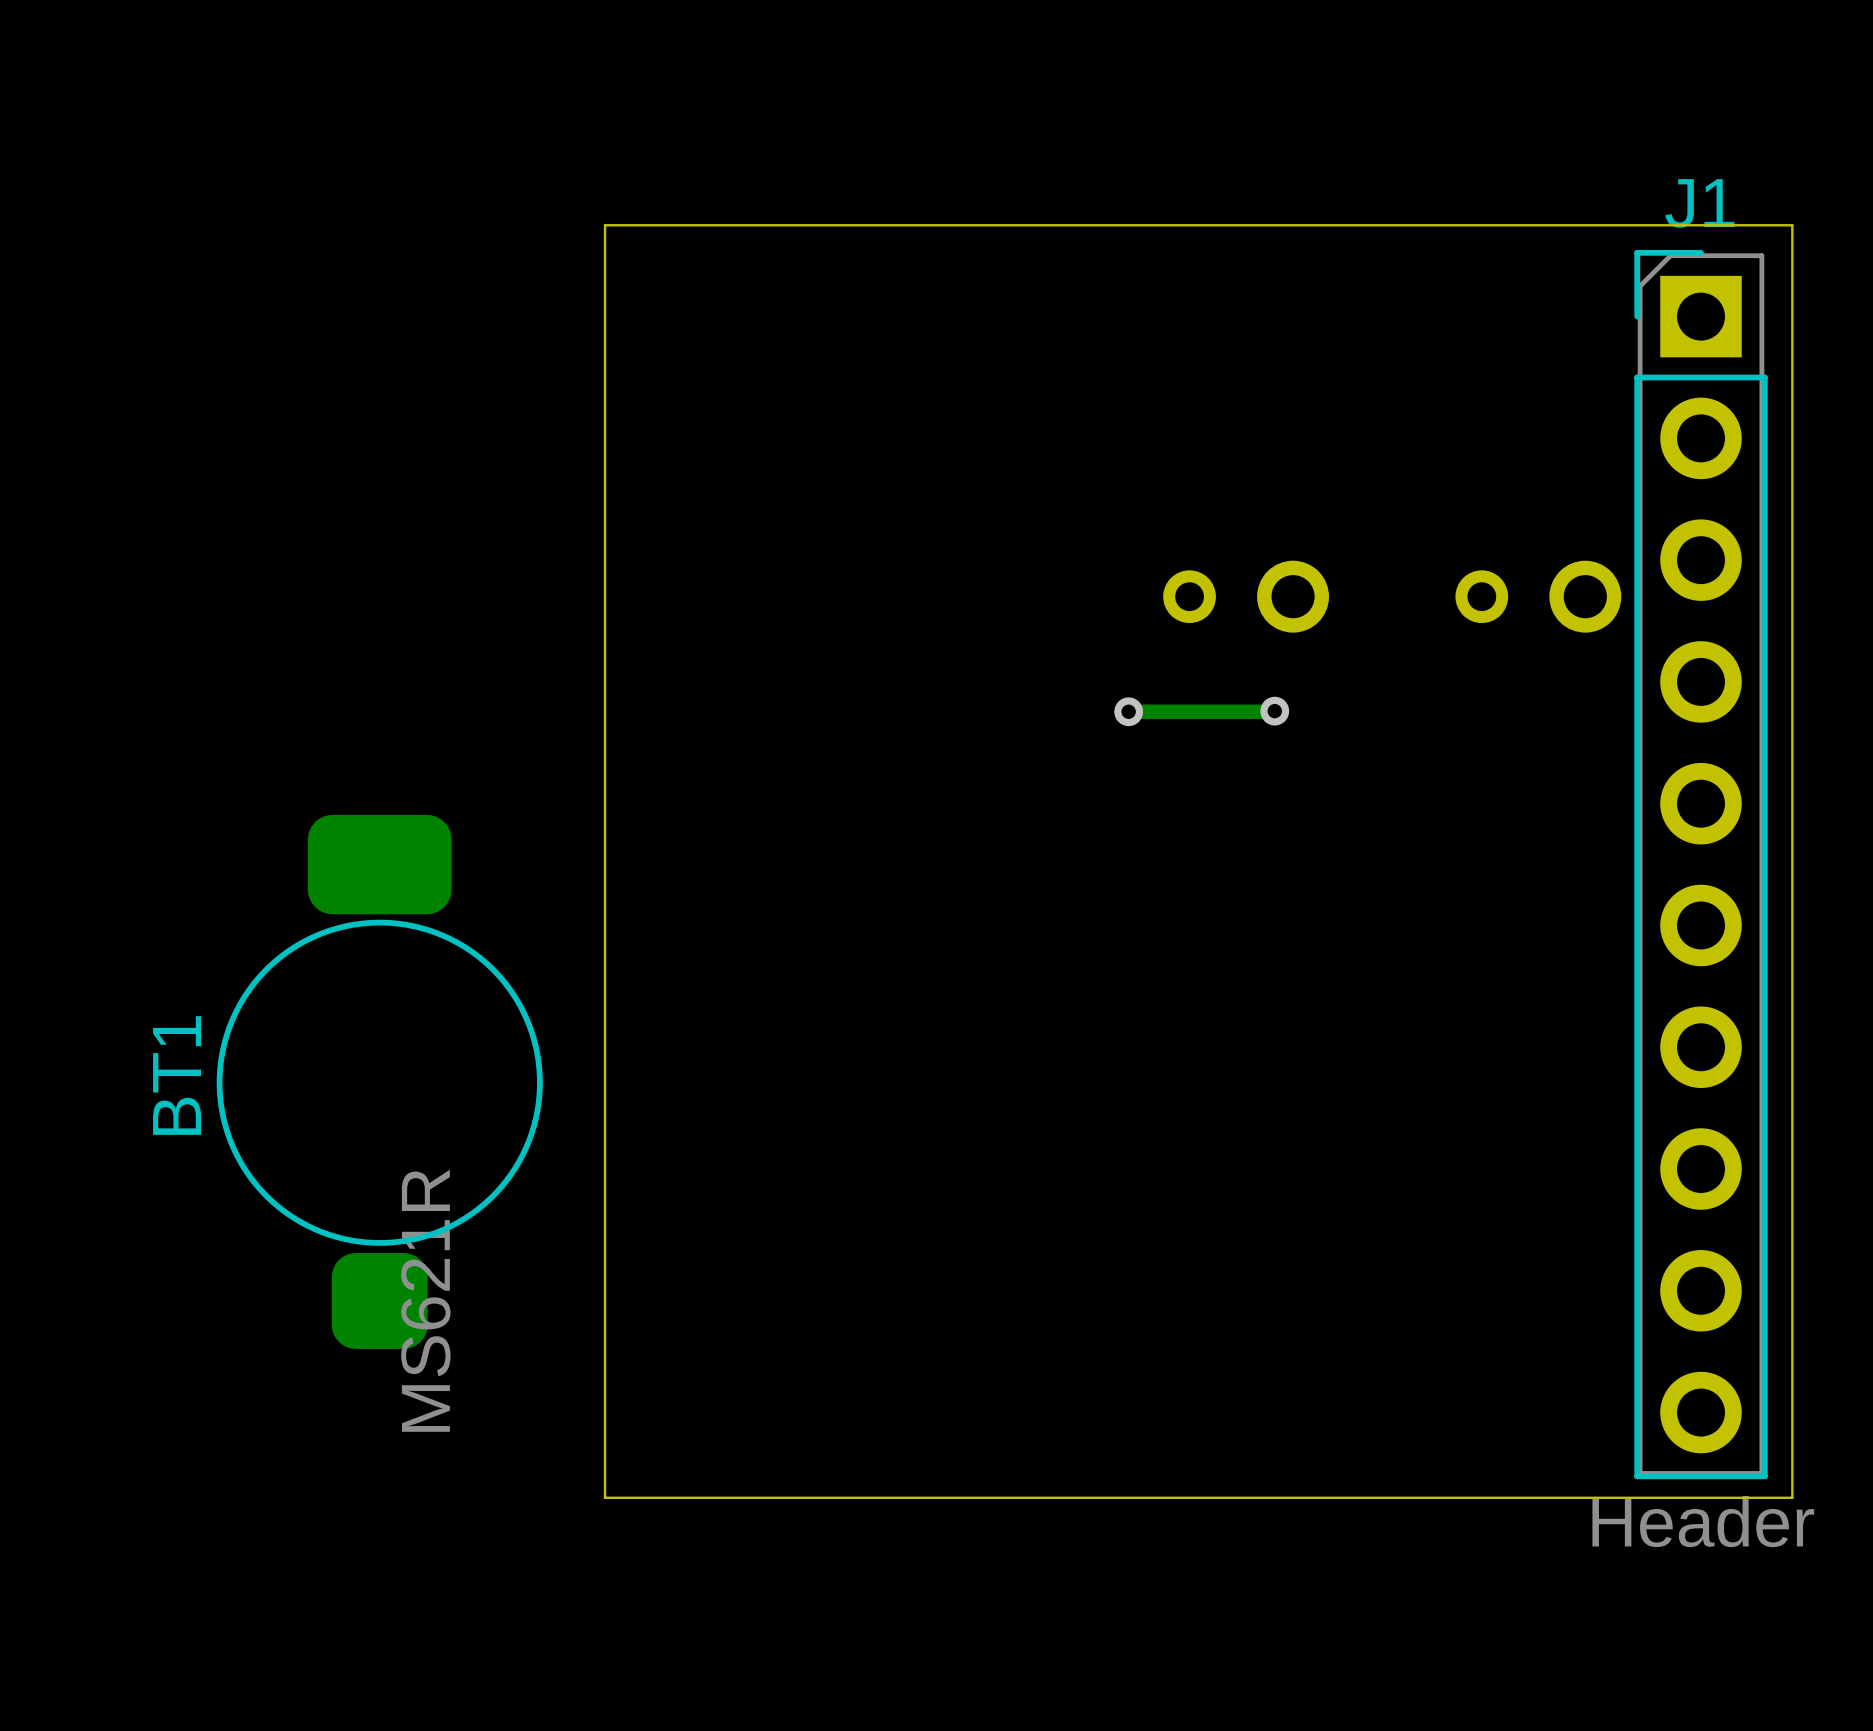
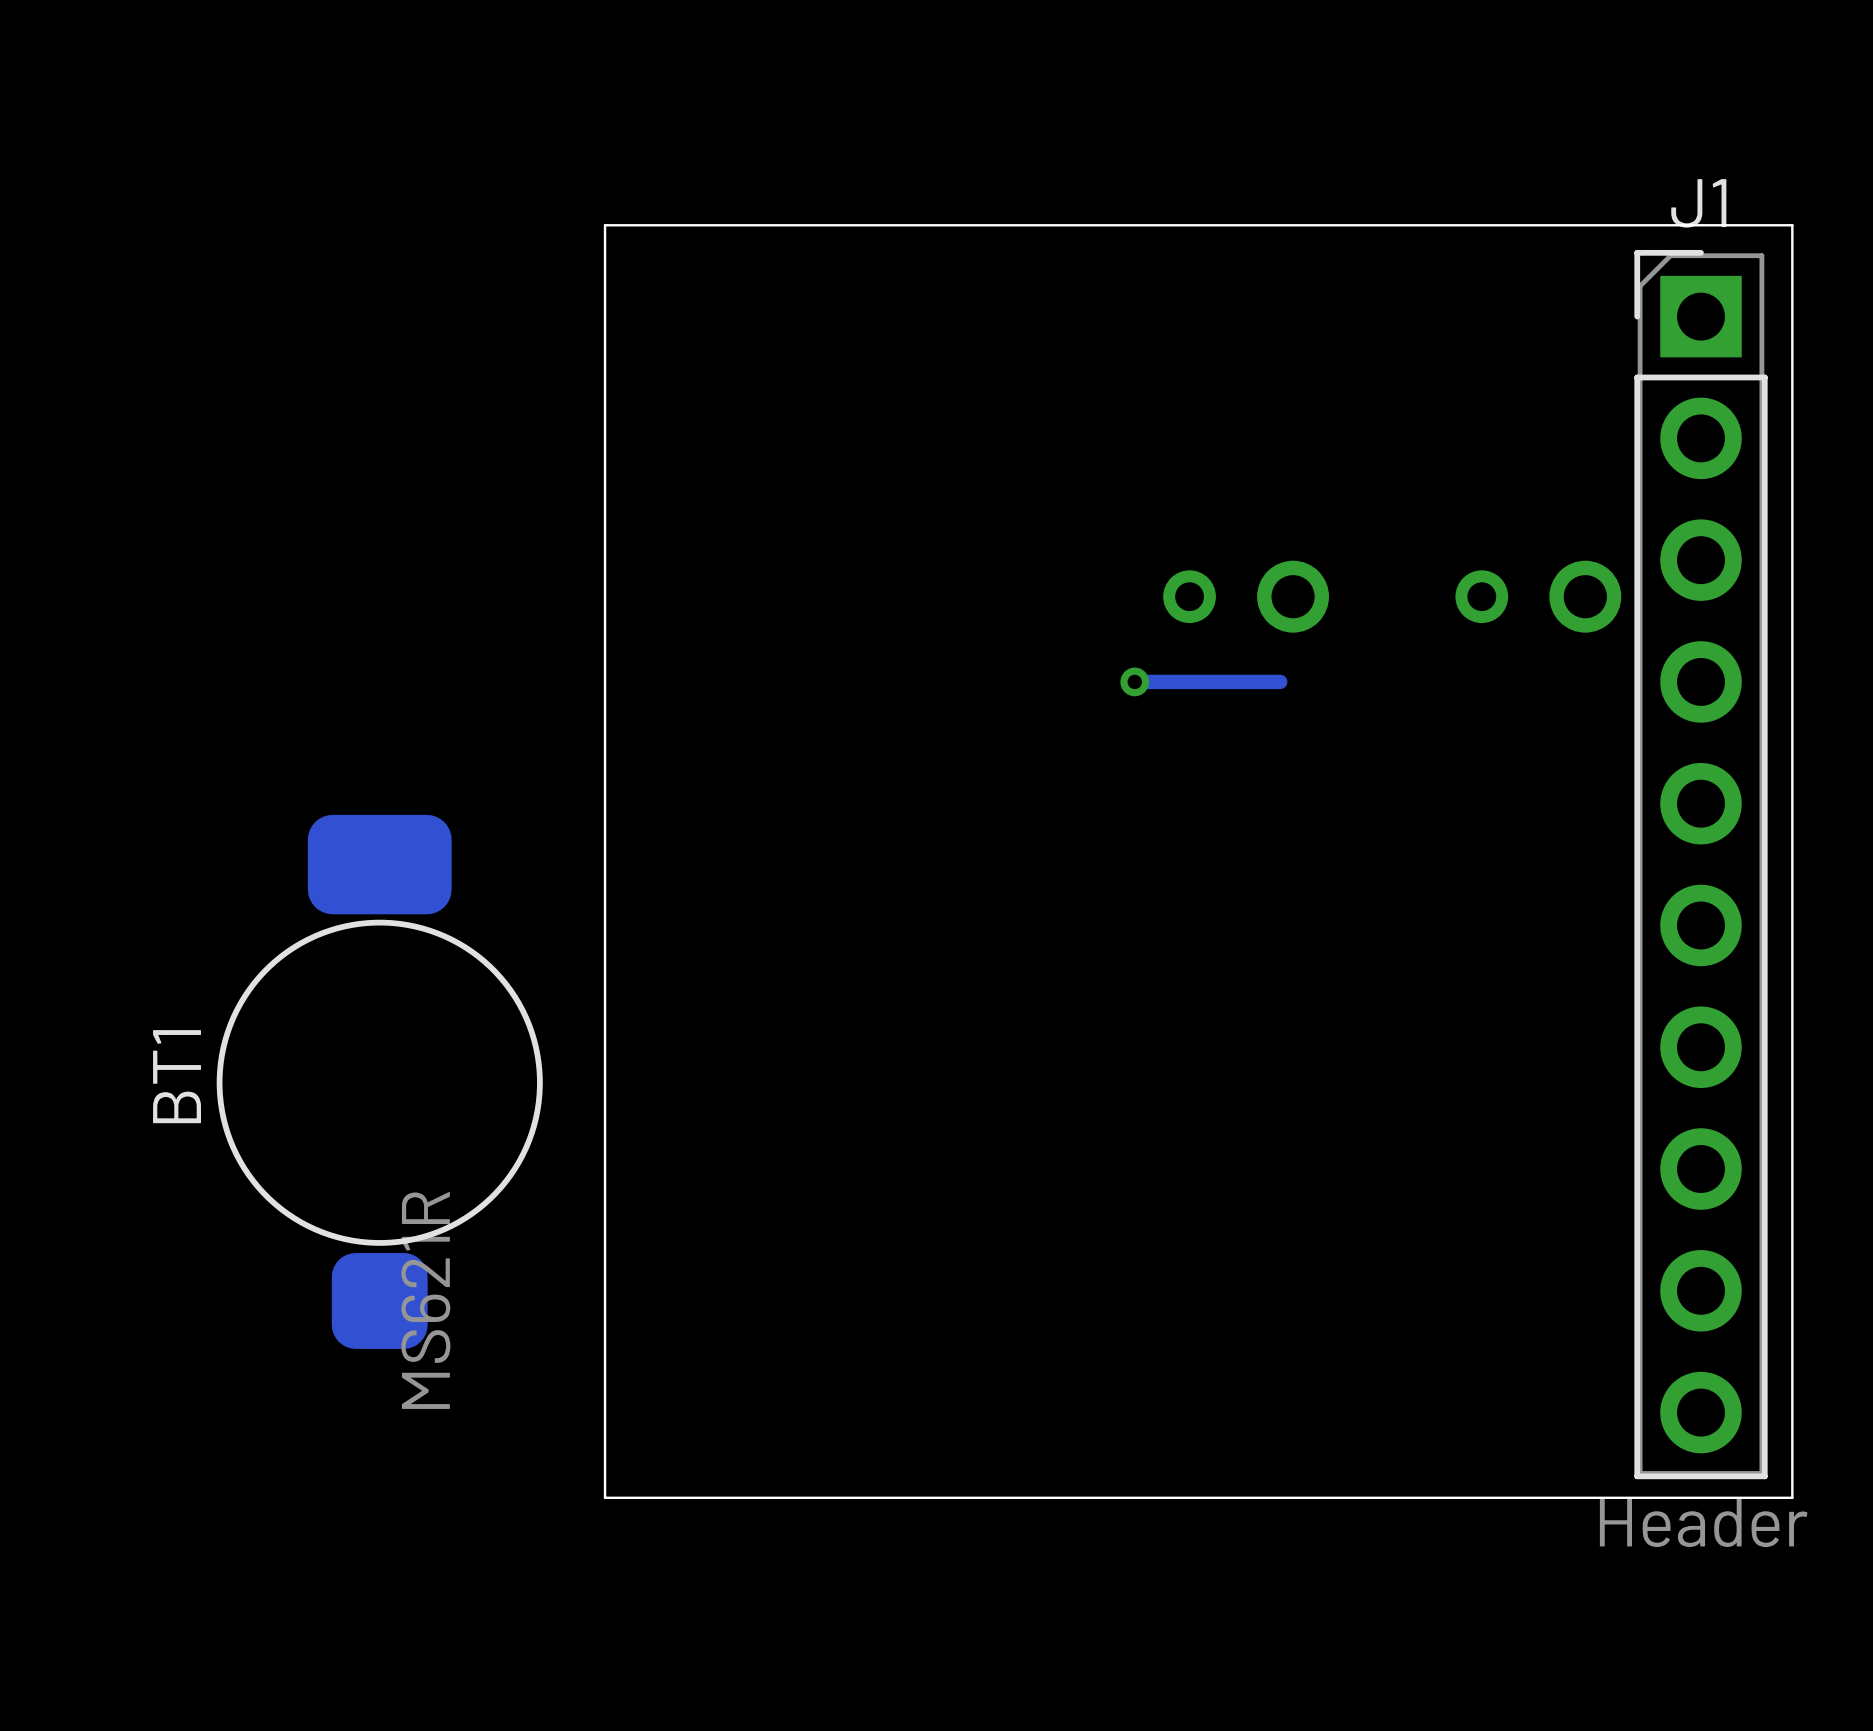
via position: (1128, 711) -> (1134, 681)
track: (1274, 711) (1128, 711) -> (1280, 681) (1134, 681)
via: (1274, 711) -> none

